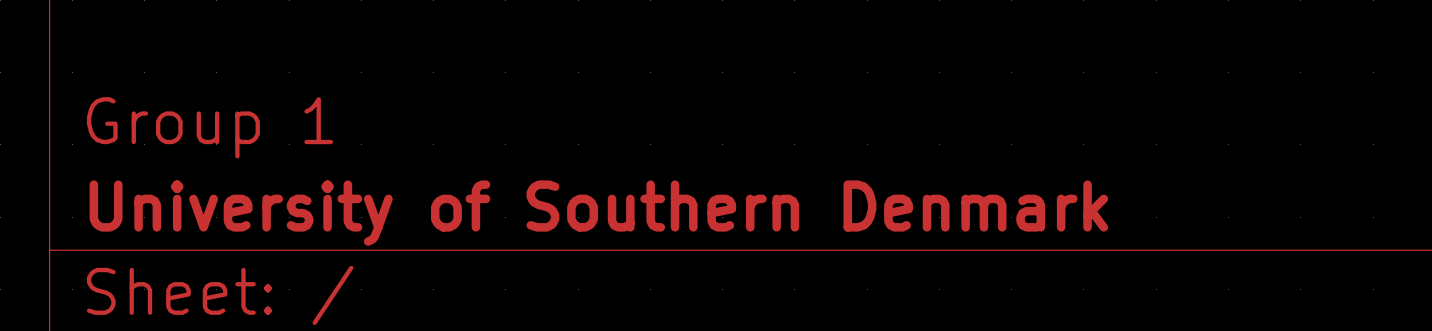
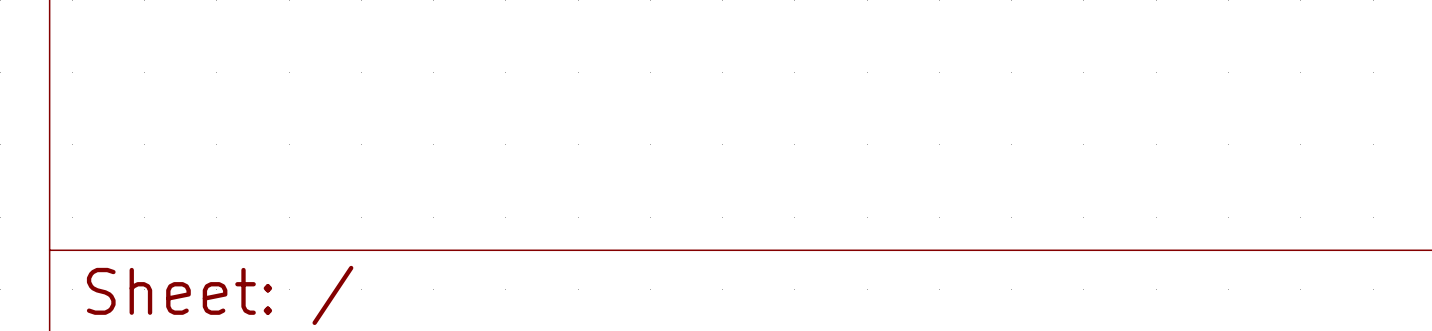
title block: Group 1 (209, 127) -> none
title block: University of Southern Denmark (598, 213) -> none

